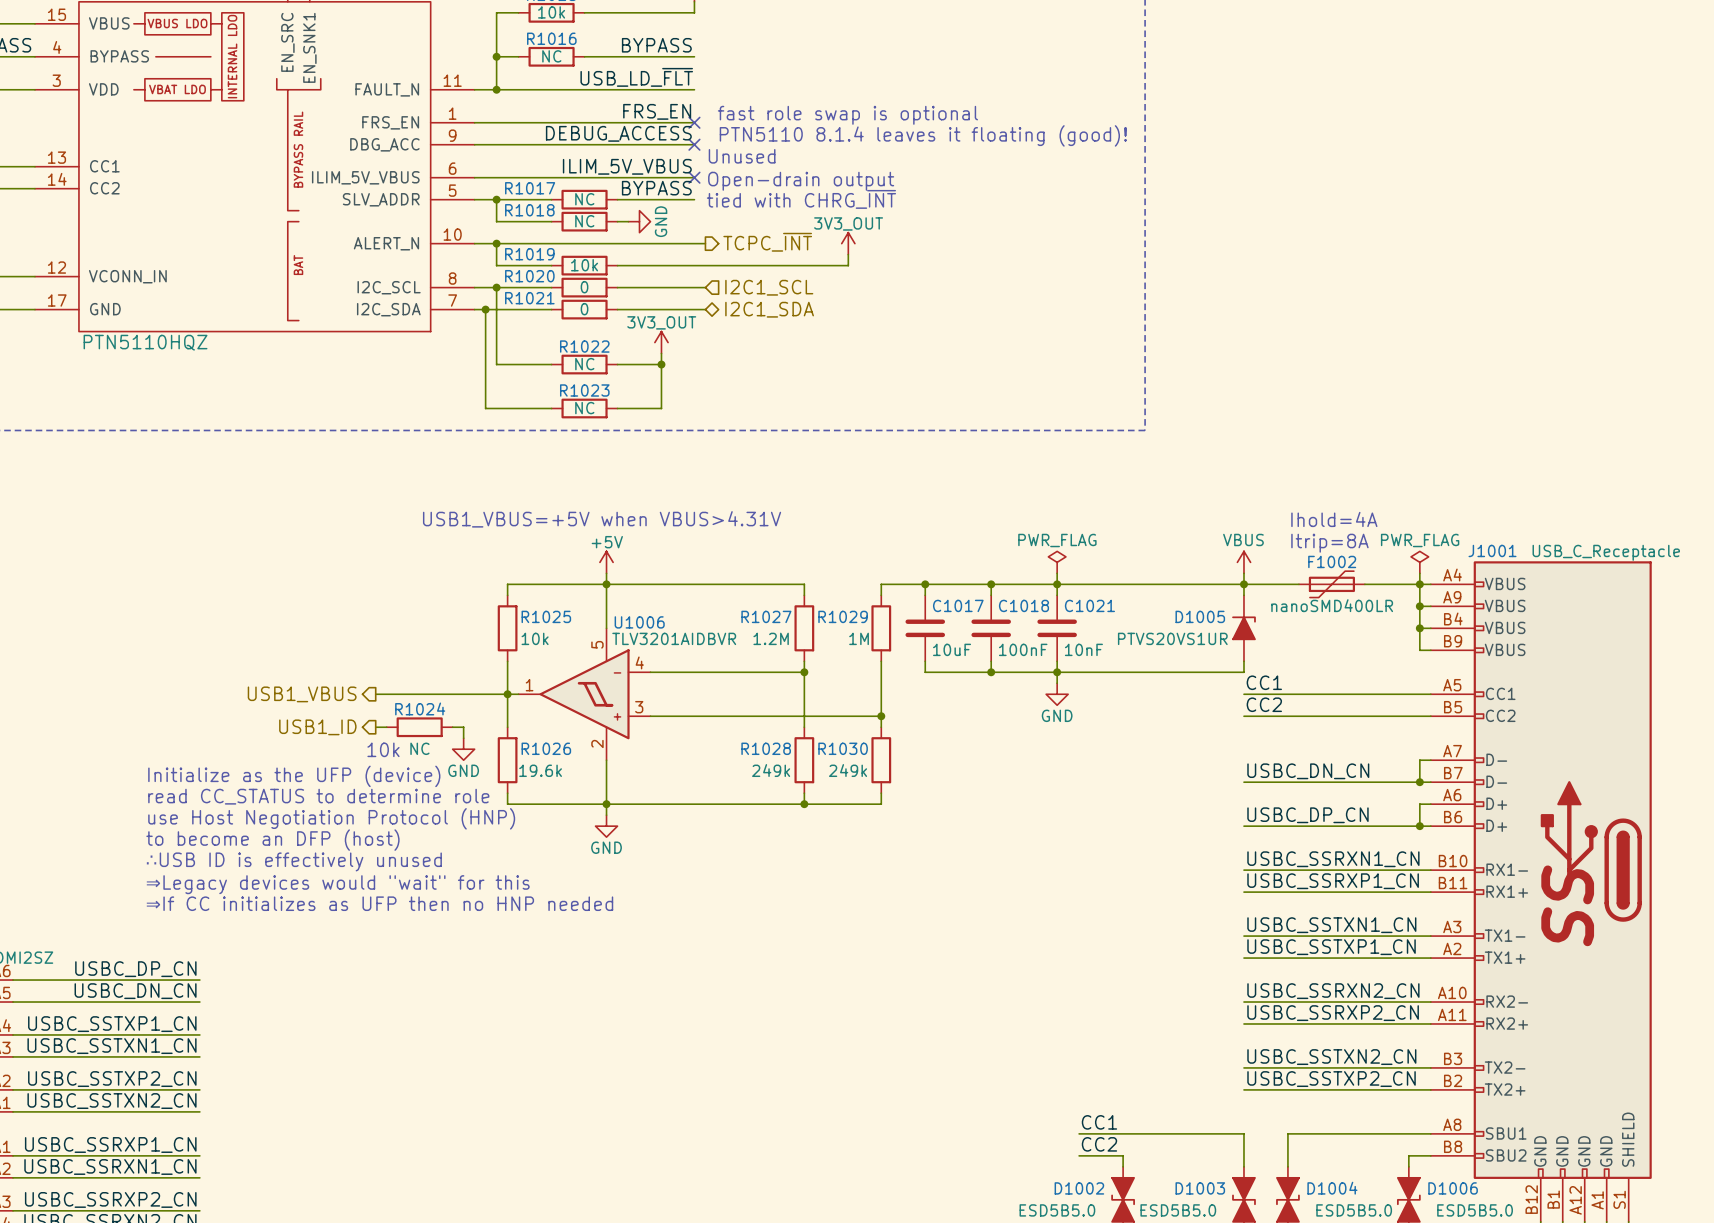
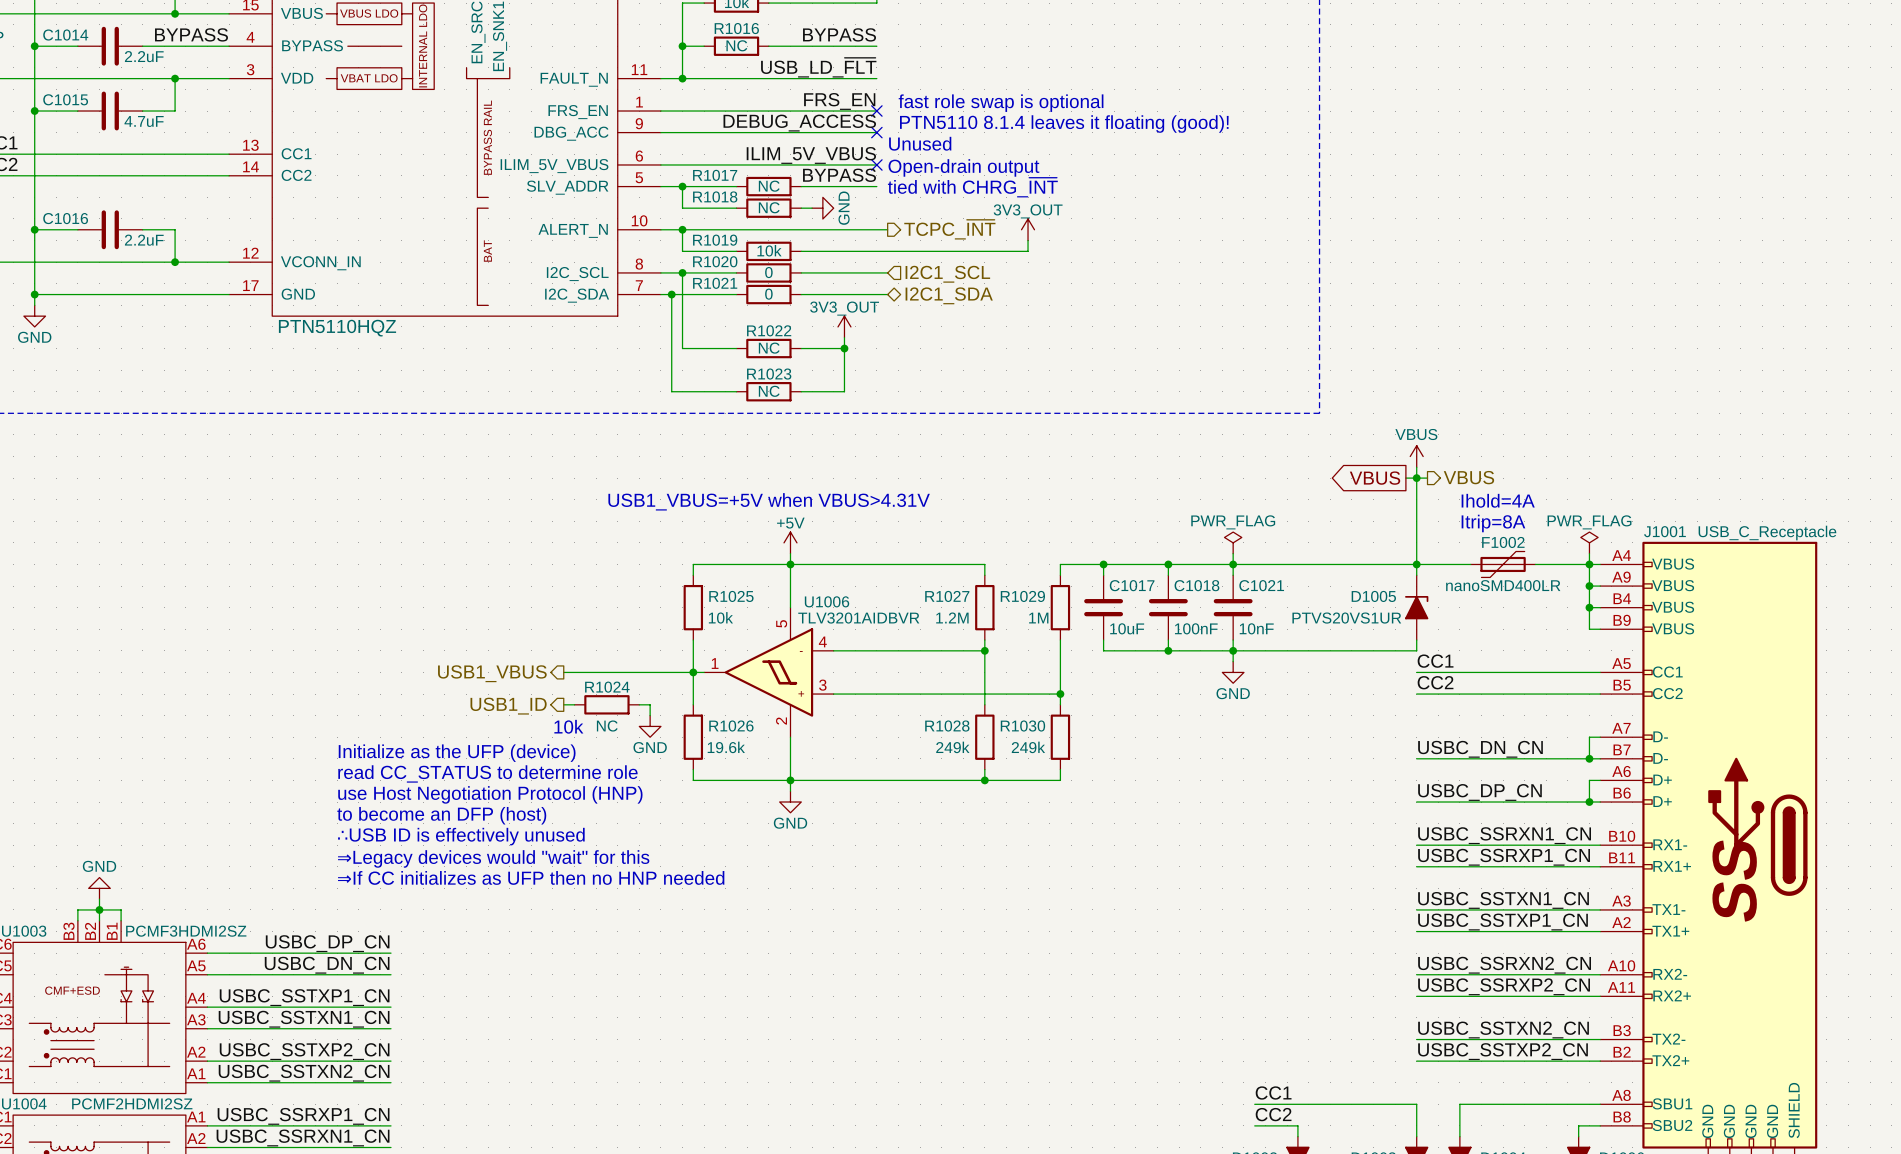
wire: none -> (1416, 467) (1416, 553)
hierarchical label: none -> VBUS (1468, 477)
global label: none -> VBUS (1375, 478)
wire: none -> (1405, 478) (1427, 478)
junction: none -> (1416, 478)
power symbol position: VBUS (1243, 562) -> VBUS (1416, 456)

